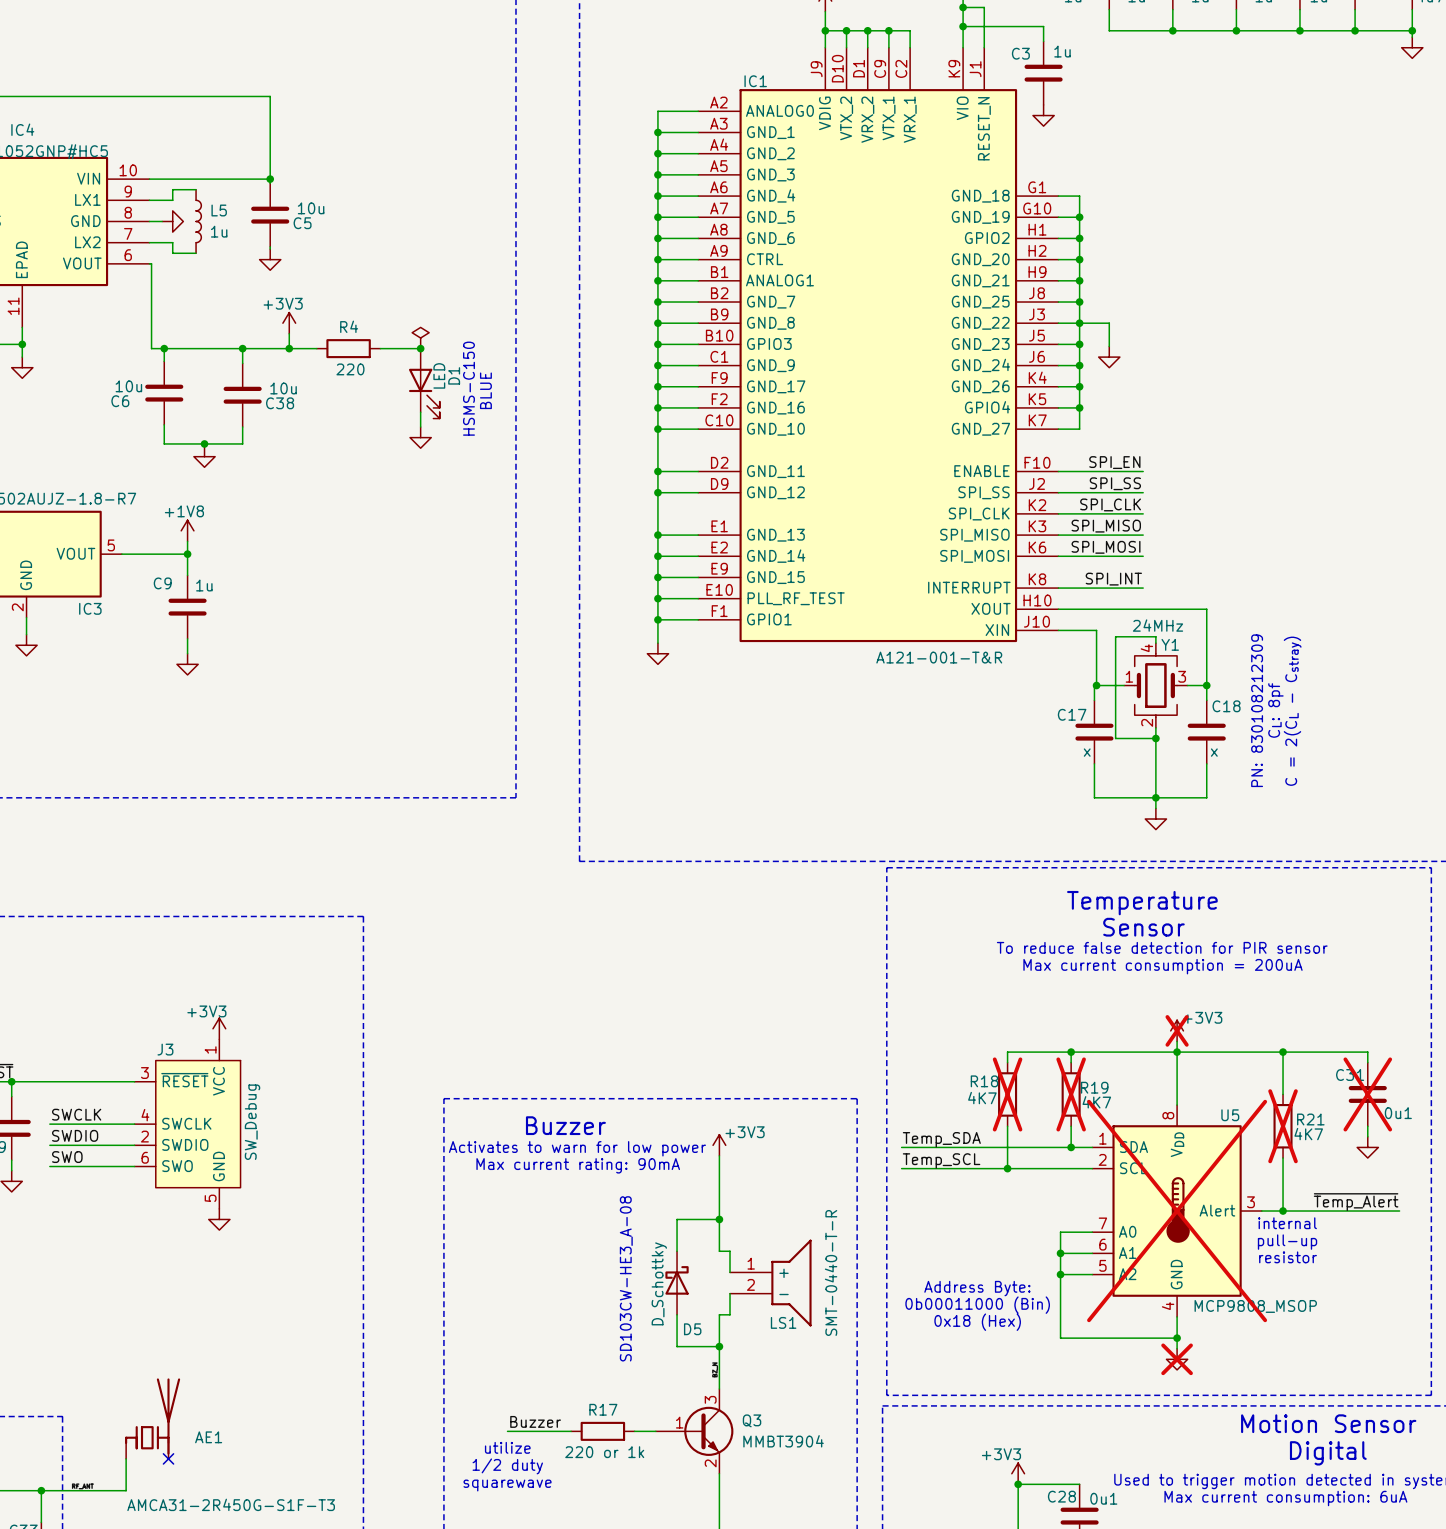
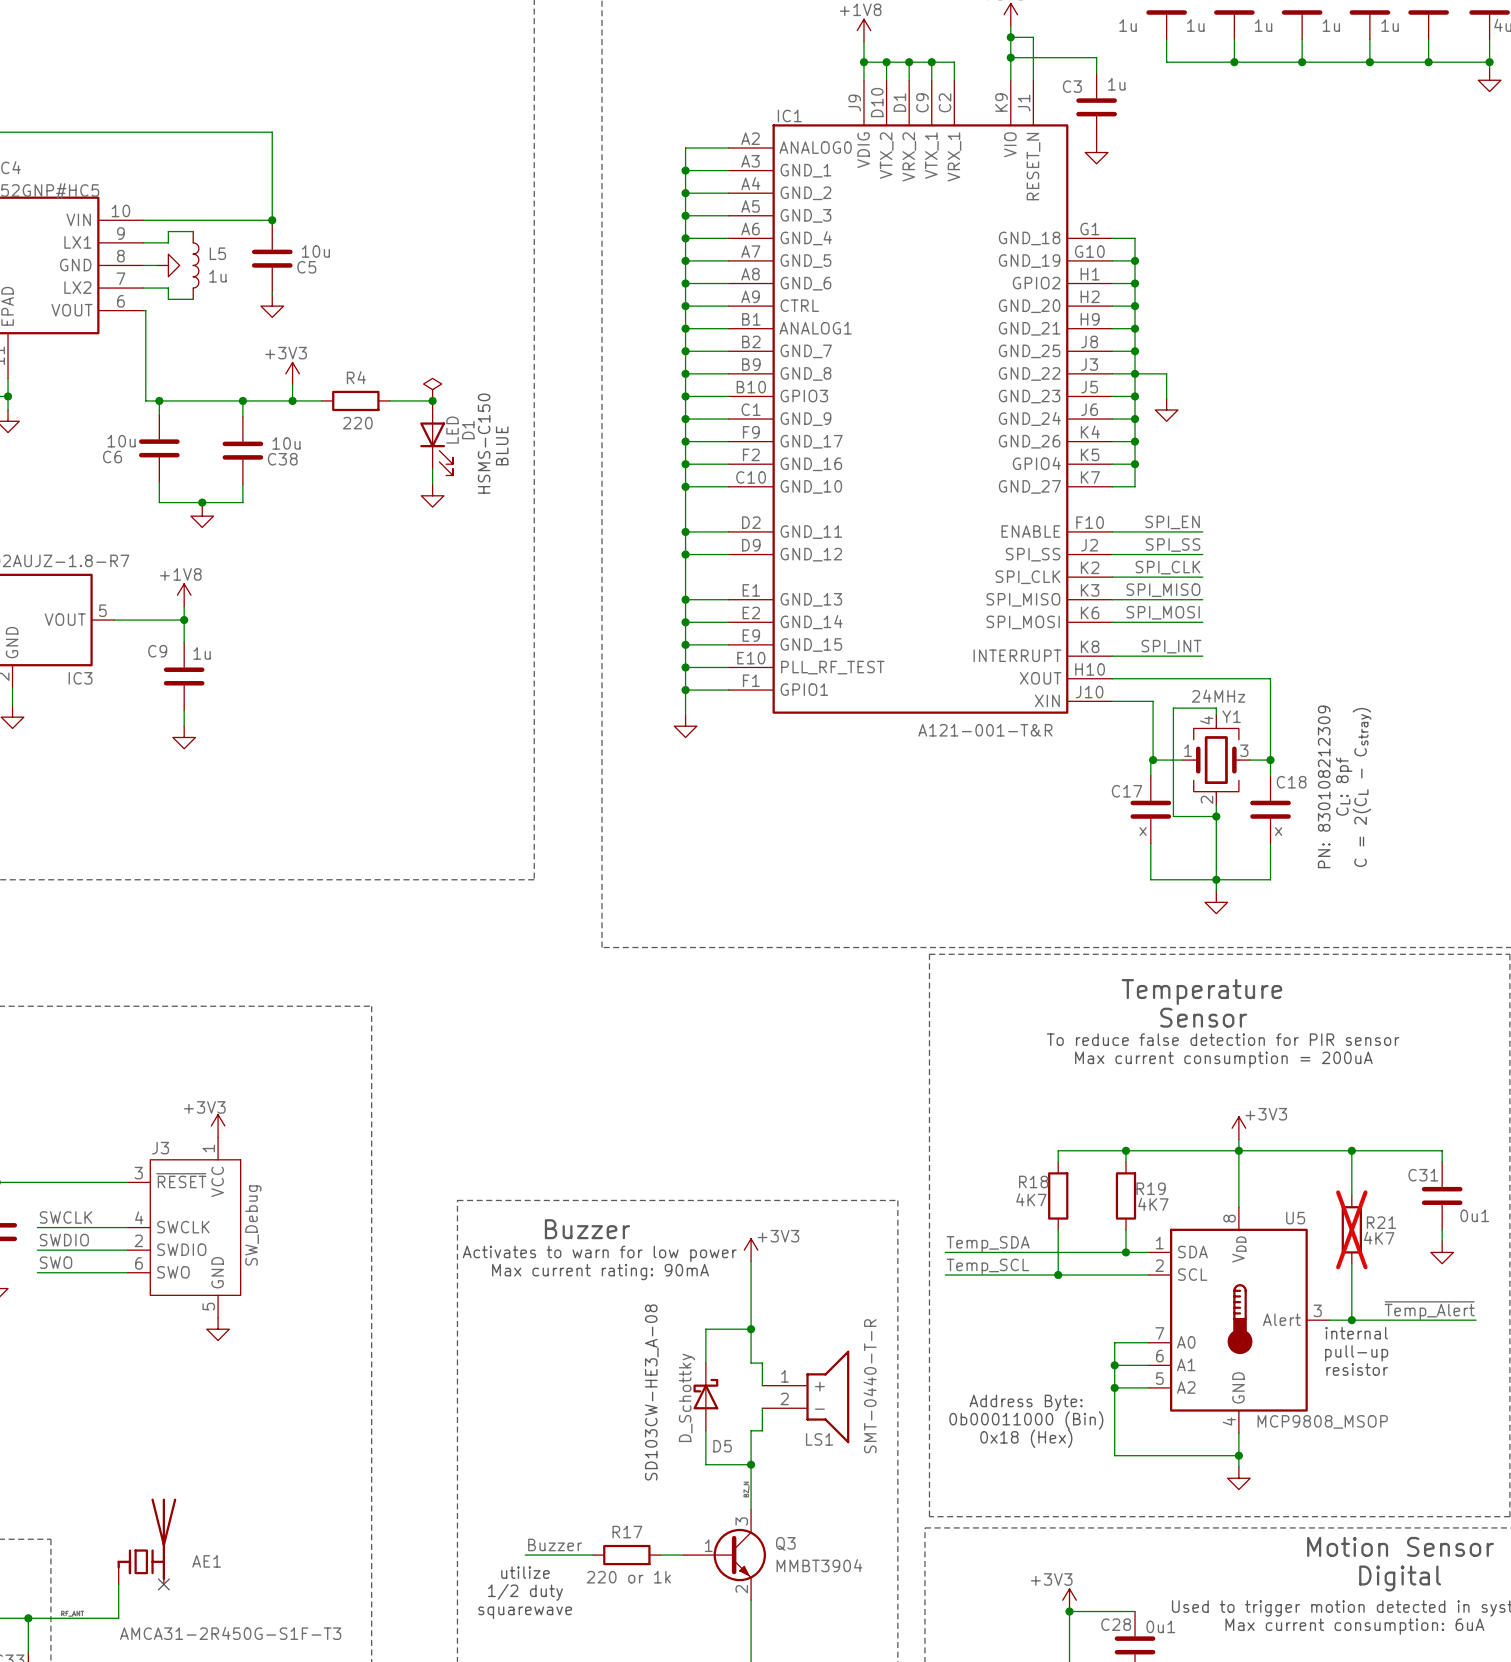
power symbol do-not-place cross: (1177, 1030) -> none
R18 do-not-place cross: (1007, 1094) -> none
R19 do-not-place cross: (1071, 1094) -> none
C31 do-not-place cross: (1367, 1094) -> none
U5 do-not-place cross: (1177, 1211) -> none
power symbol do-not-place cross: (1177, 1359) -> none

